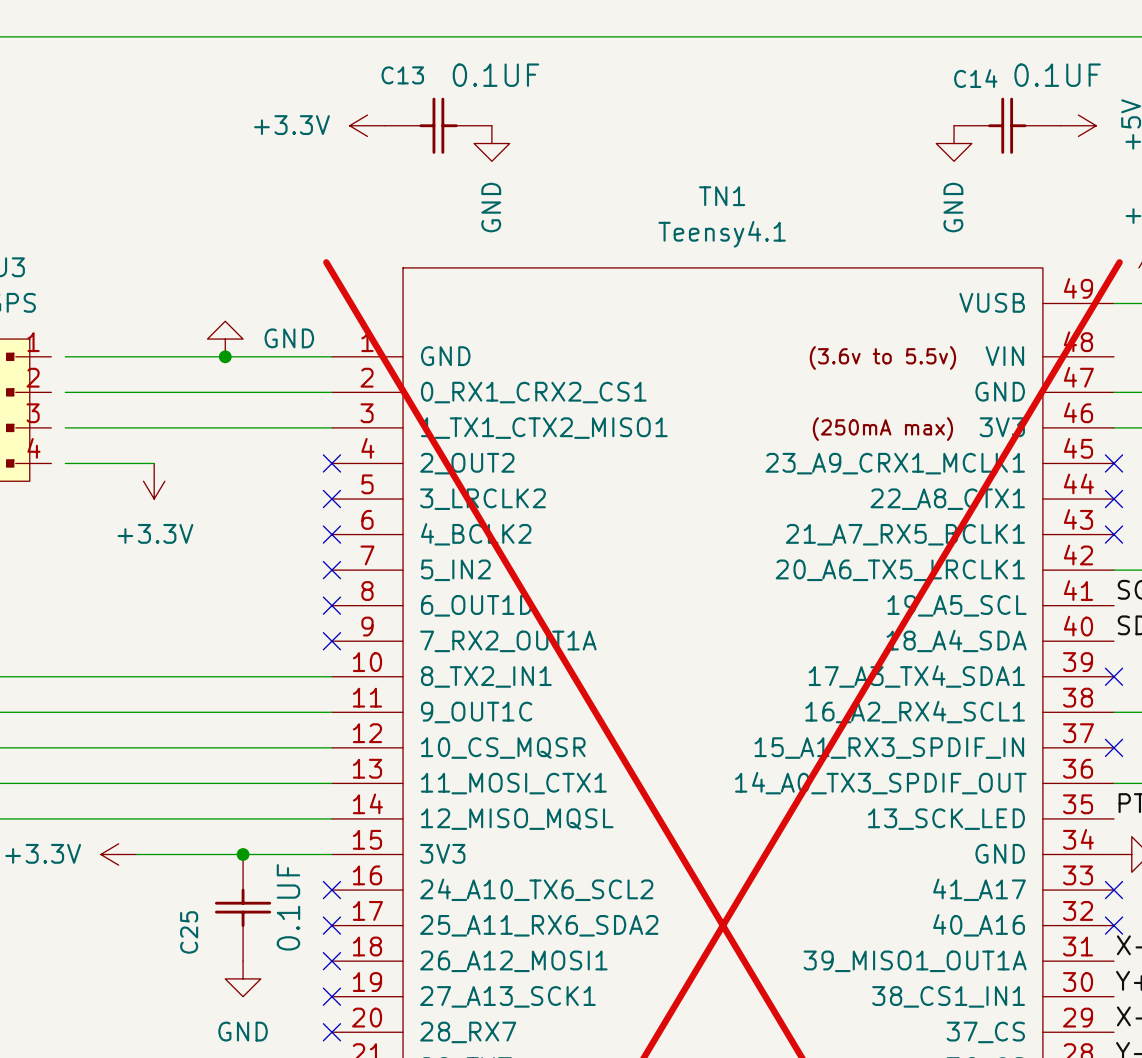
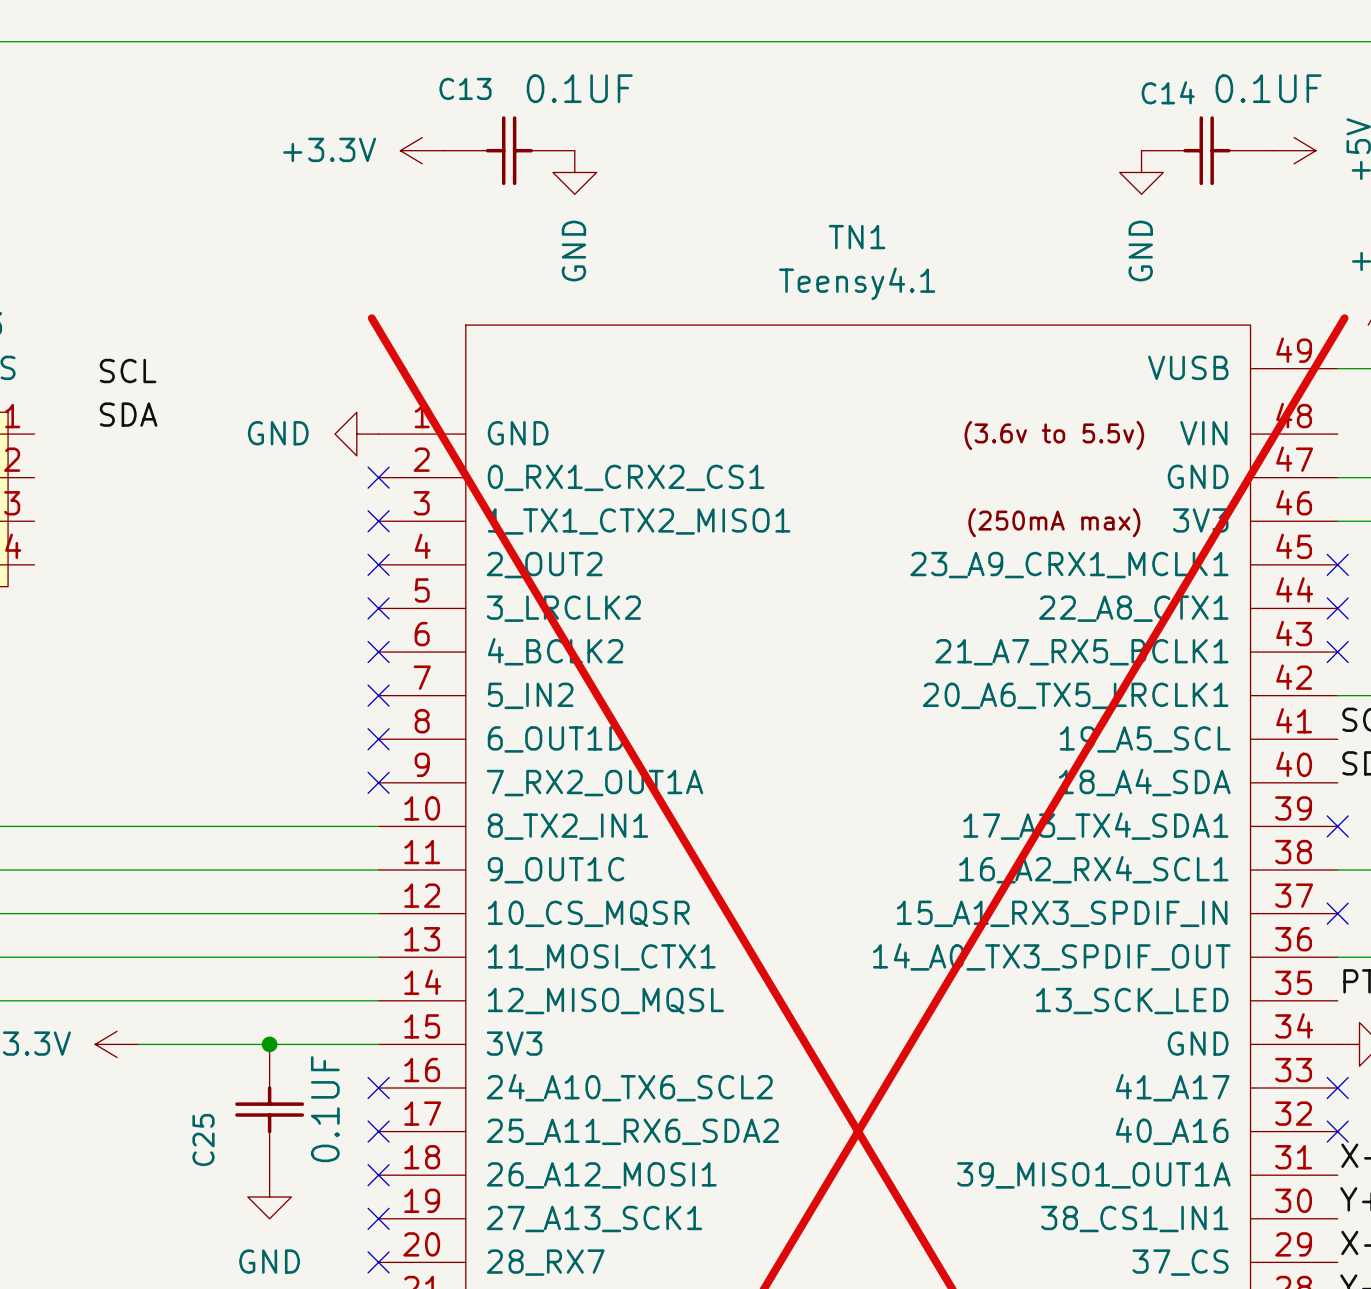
label: none -> SCL (128, 371)
power symbol text position: GND (289, 338) -> GND (278, 433)
power symbol rotation: 0° (225, 339) -> 90° counterclockwise (356, 434)
power symbol position: GND (225, 339) -> GND (356, 434)
label: none -> SDA (128, 414)
wire: (65, 356) (331, 356) -> none
junction: (225, 356) -> none
wire: (65, 392) (331, 392) -> none
no-connect mark: none -> (378, 477)
wire: (65, 427) (331, 427) -> none
no-connect mark: none -> (378, 521)
wire: (65, 463) (154, 463) -> none
power symbol: +3.3V (154, 481) -> none

